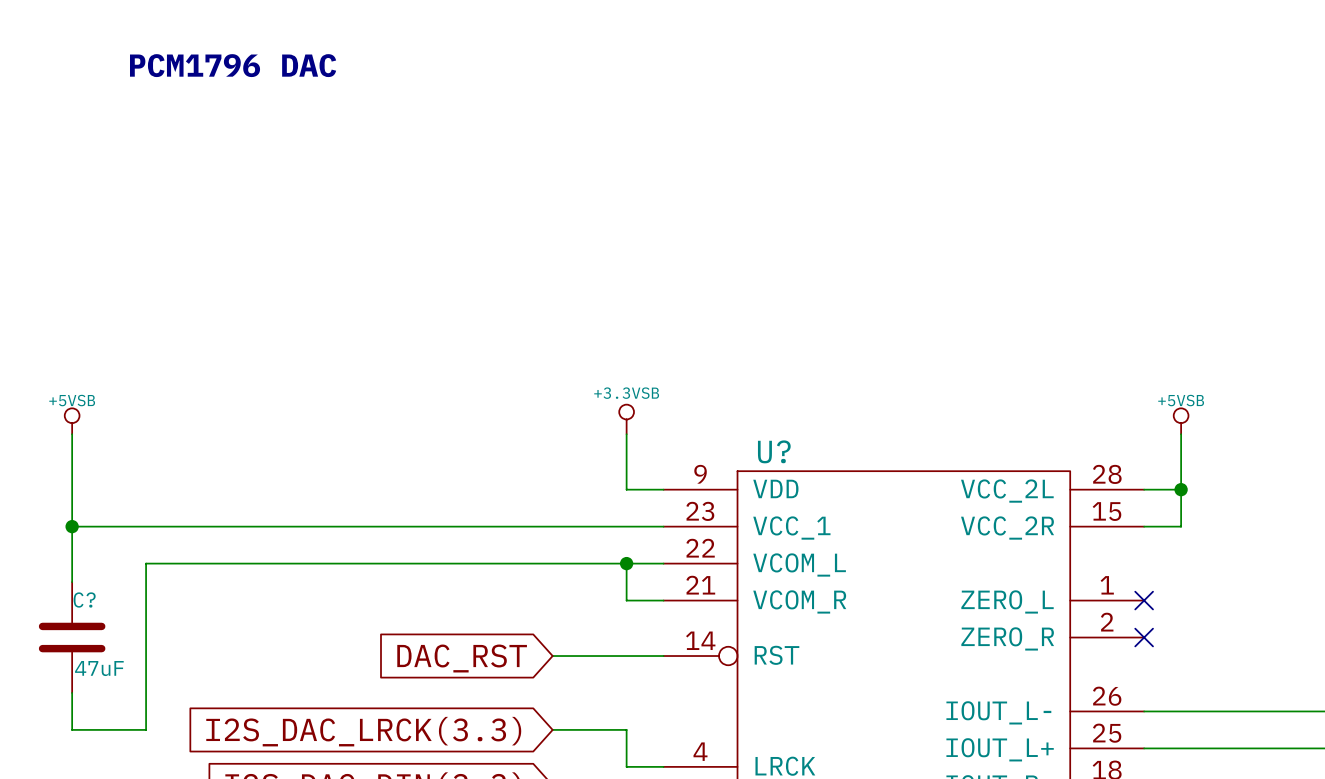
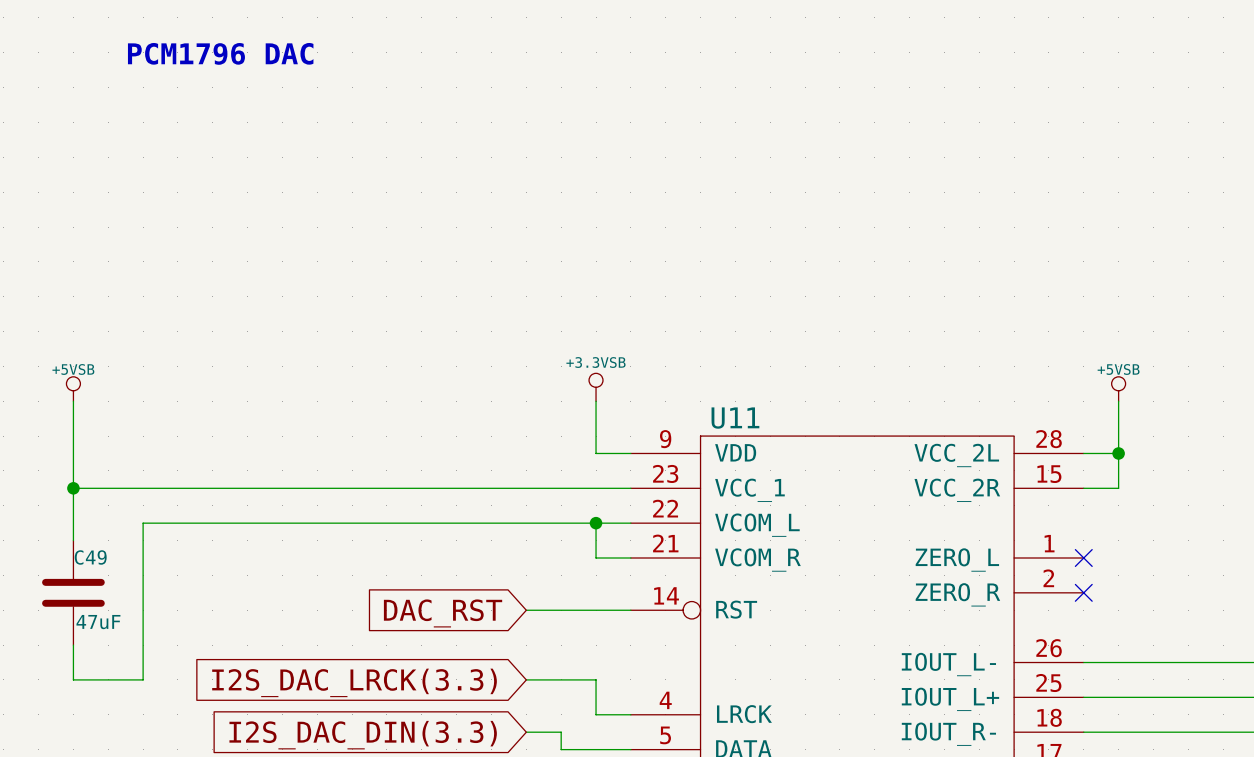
U? name: U? (774, 451) -> U11 (735, 418)
C? name: C? (84, 600) -> C49 (90, 557)

